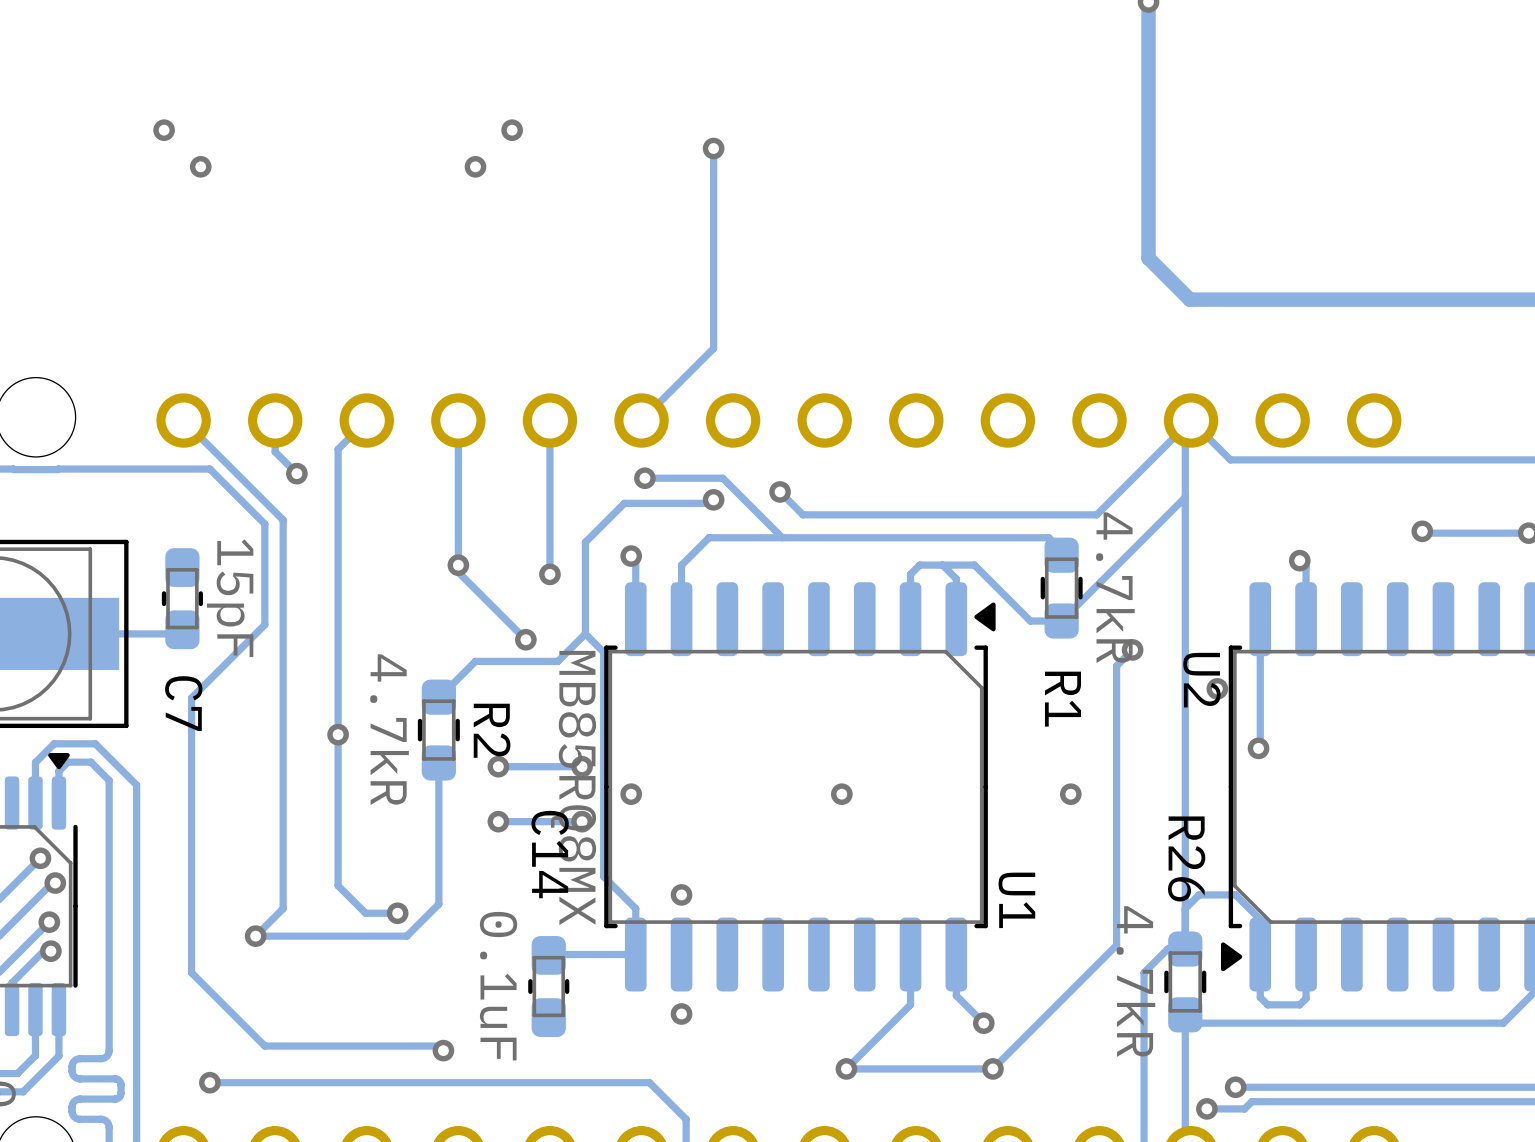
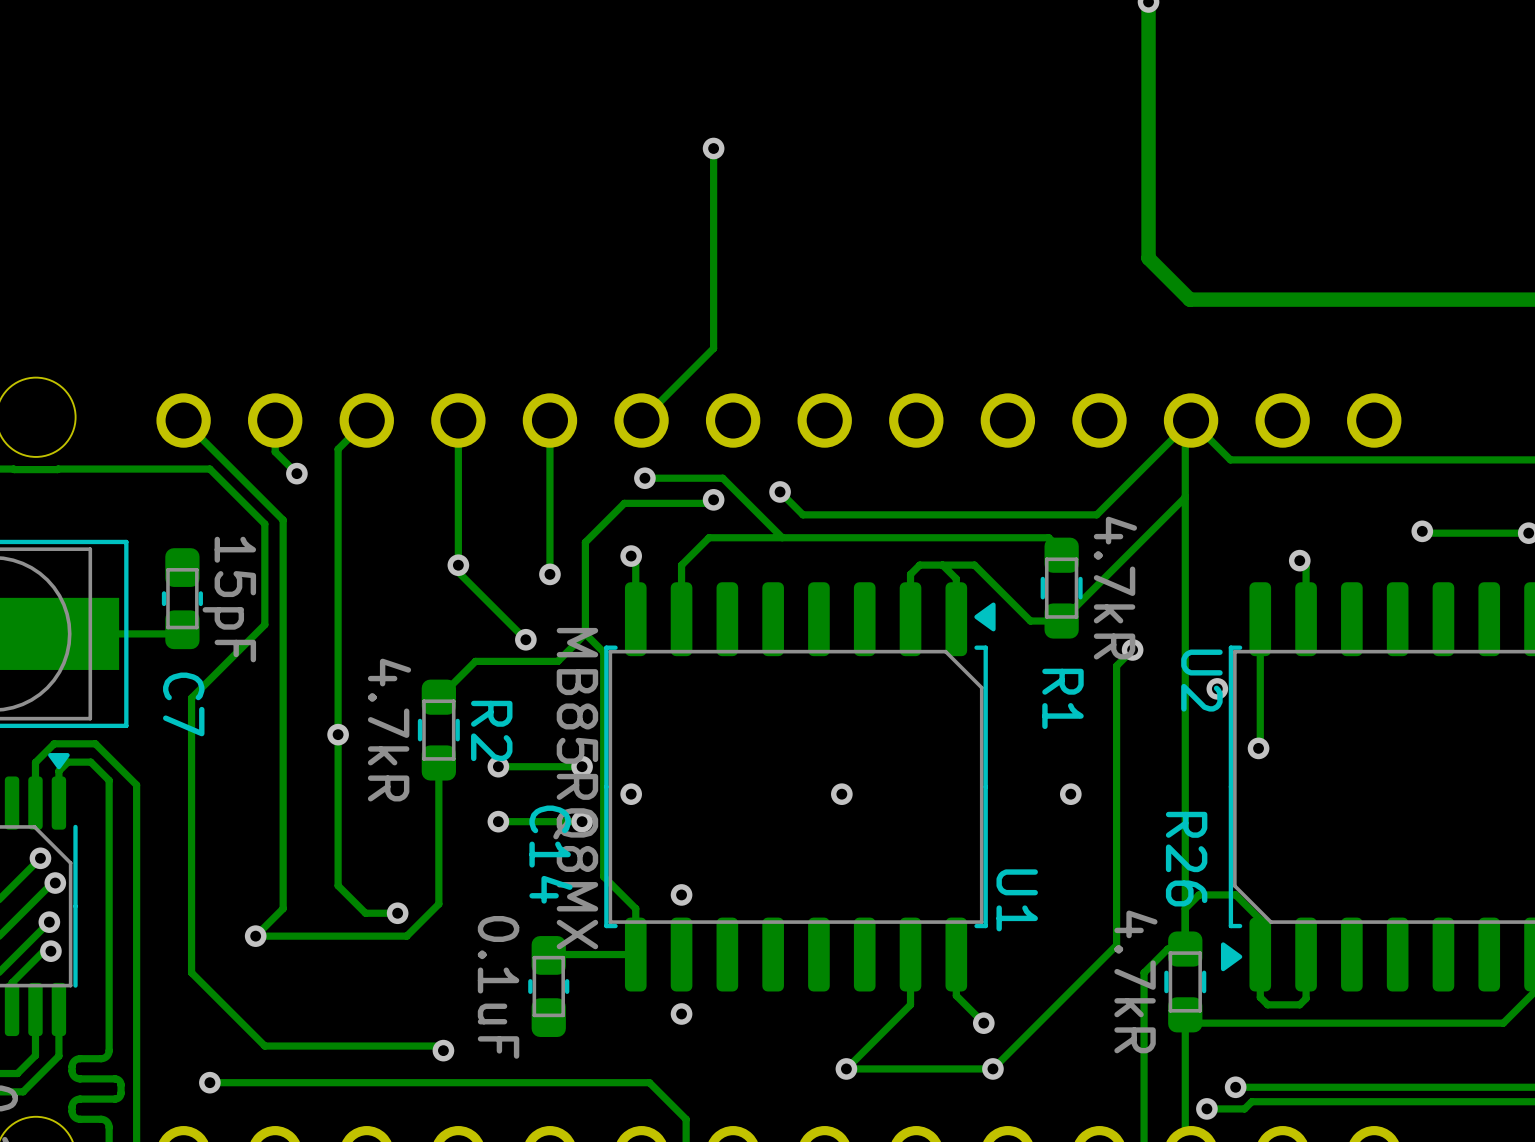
via: (164, 130) -> none
via: (512, 130) -> none
via: (200, 166) -> none
via: (475, 166) -> none

